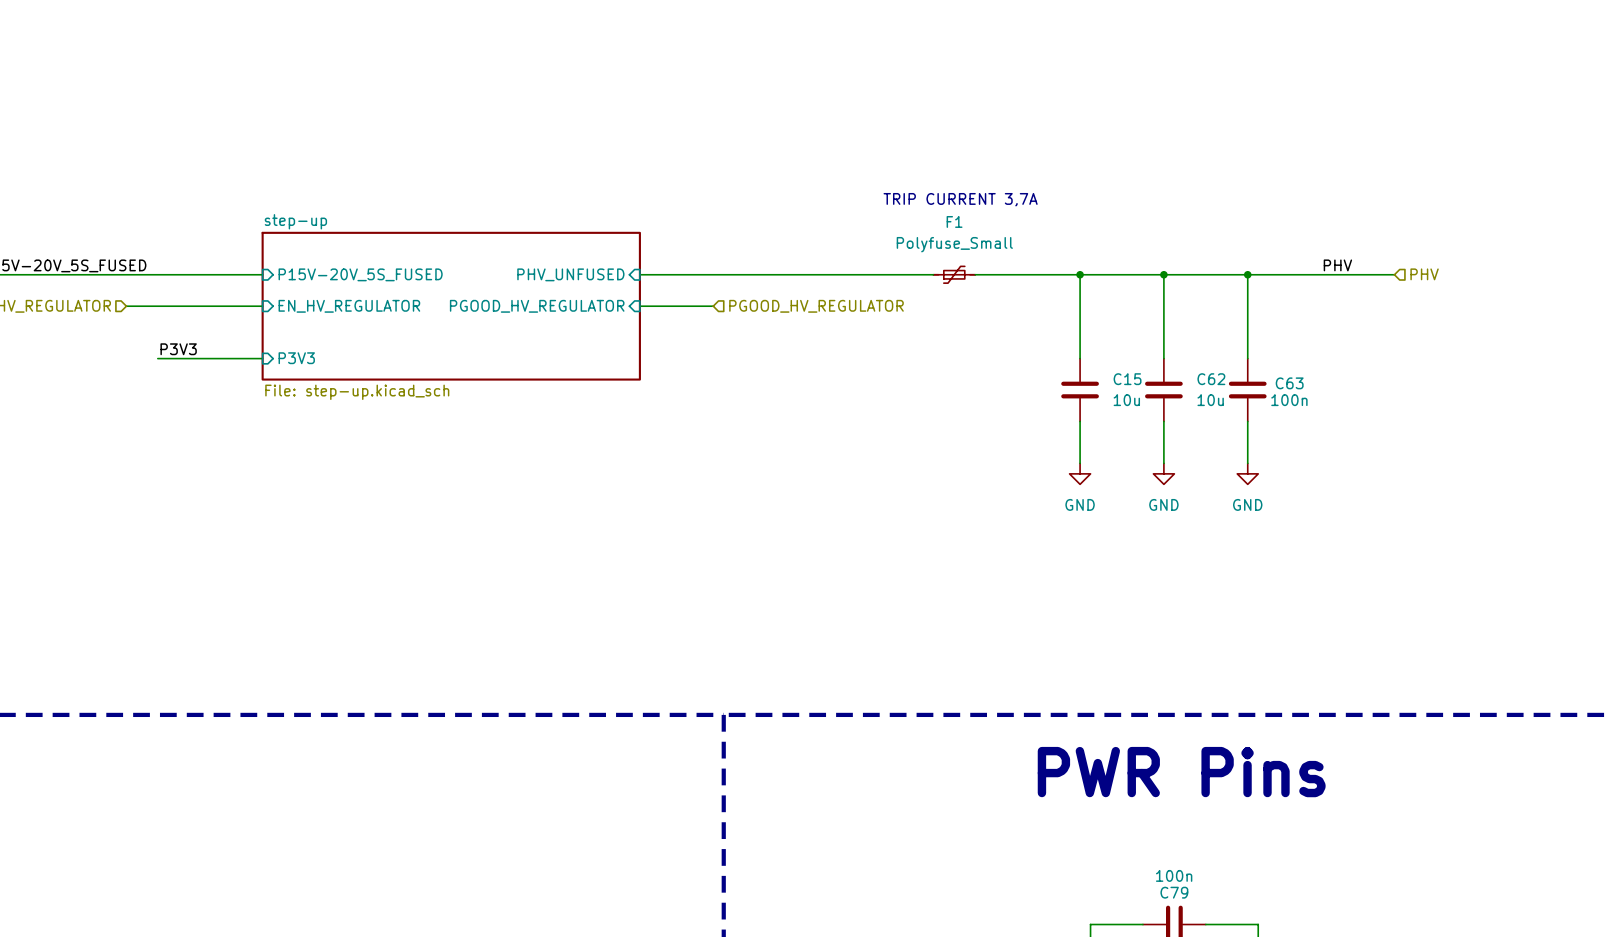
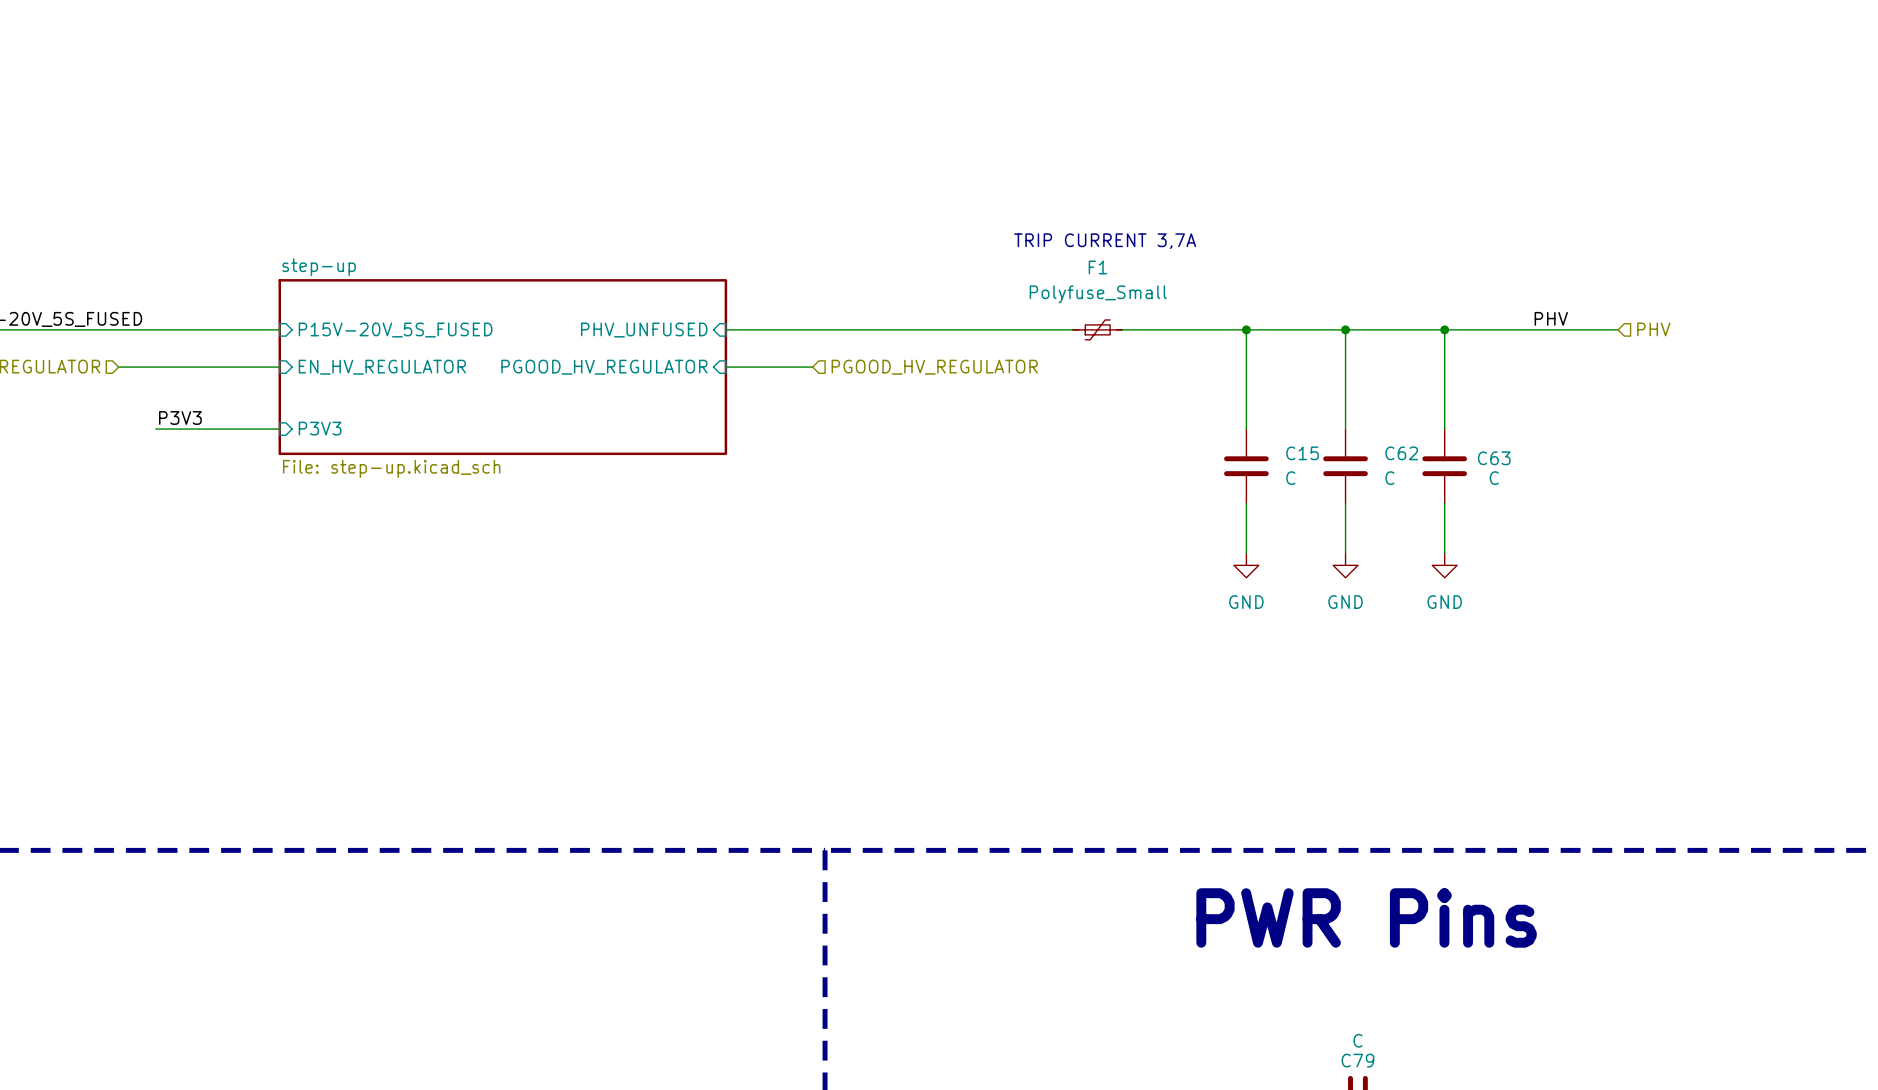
C15 value: 10u (1126, 400) -> C (1290, 478)
C62 value: 10u (1210, 400) -> C (1389, 478)
C63 value: 100n (1289, 400) -> C (1494, 478)
C79 value: 100n (1174, 875) -> C (1357, 1040)

